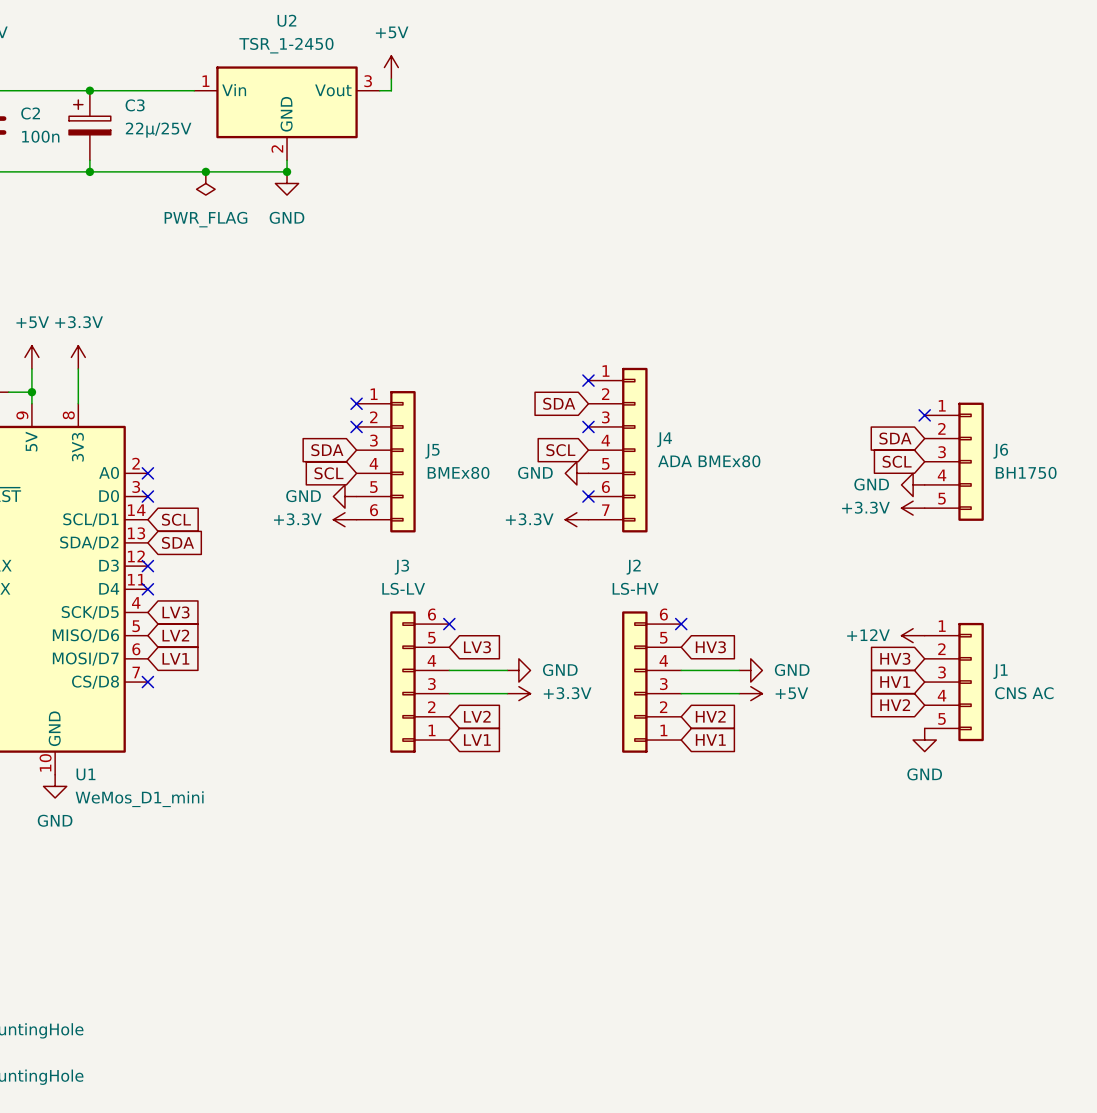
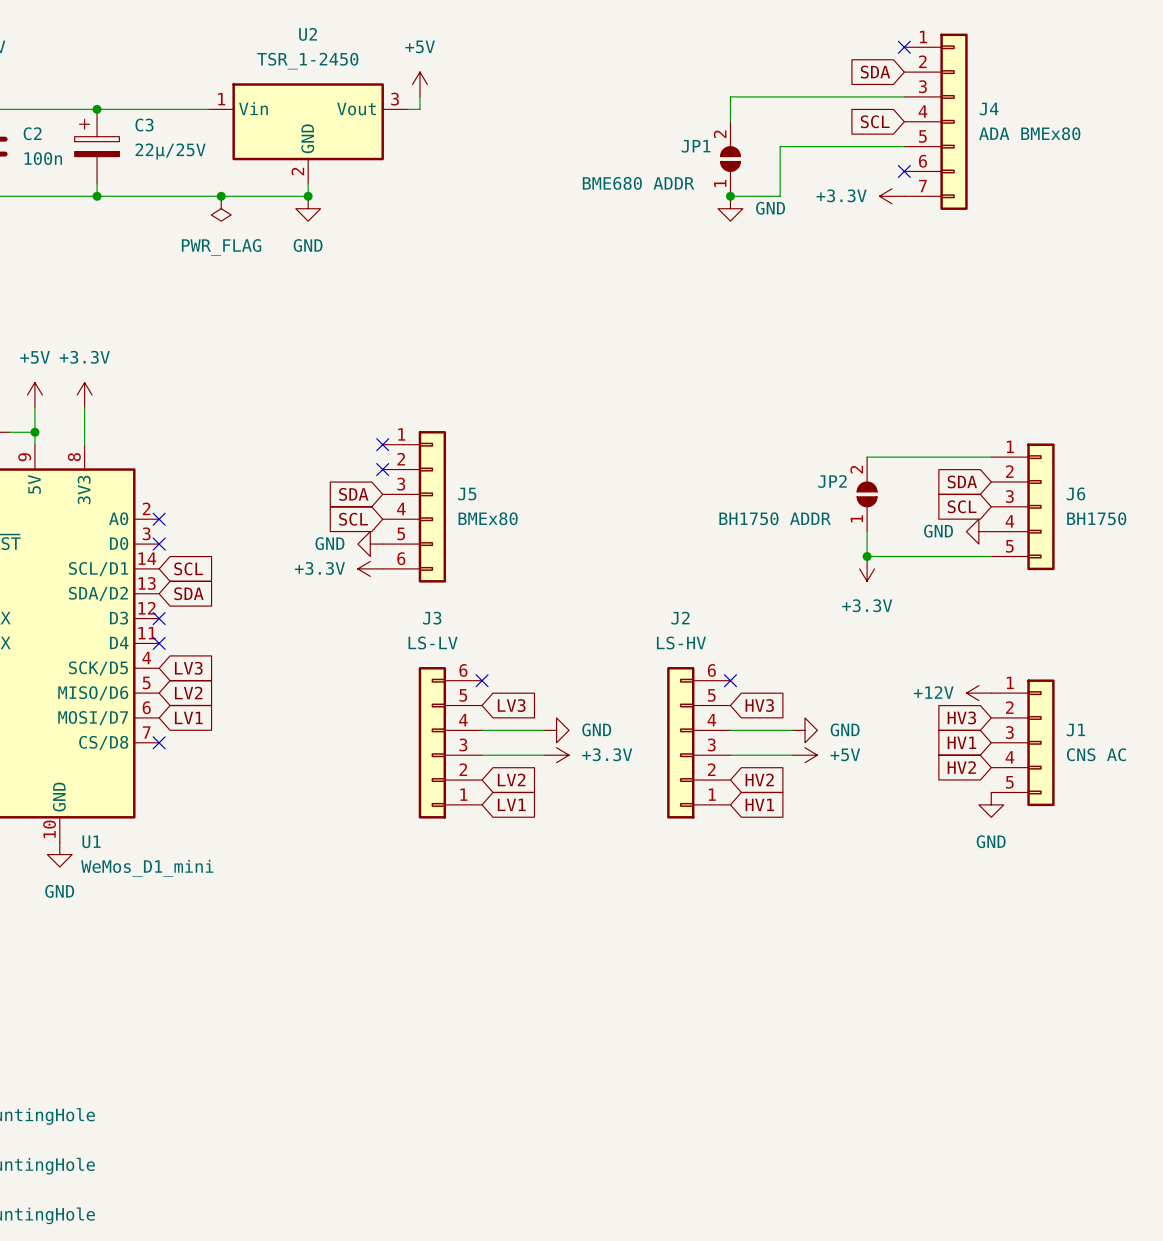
no-connect mark: none -> (904, 47)
global label: none -> SDA (875, 72)
wire: none -> (904, 96) (730, 96) (730, 121)
global label: none -> SCL (875, 121)
wire: none -> (904, 146) (780, 146) (780, 196) (730, 196)
JP1: none -> BME680 ADDR (730, 159)
no-connect mark: none -> (904, 171)
junction: none -> (730, 196)
power symbol: none -> +3.3V (891, 196)
power symbol: none -> GND (730, 208)
no-connect mark: (588, 380) -> none
global label: SDA (559, 403) -> none
wire: none -> (867, 457) (991, 457)
no-connect mark: (924, 415) -> none
no-connect mark: (588, 426) -> none
global label: SCL (560, 450) -> none
J4 position: (618, 450) -> (936, 121)
JP2: none -> BH1750 ADDR (867, 494)
power symbol: GND (576, 473) -> none
wire: none -> (867, 531) (867, 556) (991, 556)
no-connect mark: (588, 496) -> none
power symbol text position: +3.3V (865, 507) -> +3.3V (867, 605)
junction: none -> (867, 556)
power symbol rotation: 0° (913, 508) -> 90° counterclockwise (867, 568)
power symbol position: +3.3V (913, 508) -> +3.3V (867, 568)
power symbol: +3.3V (576, 519) -> none

